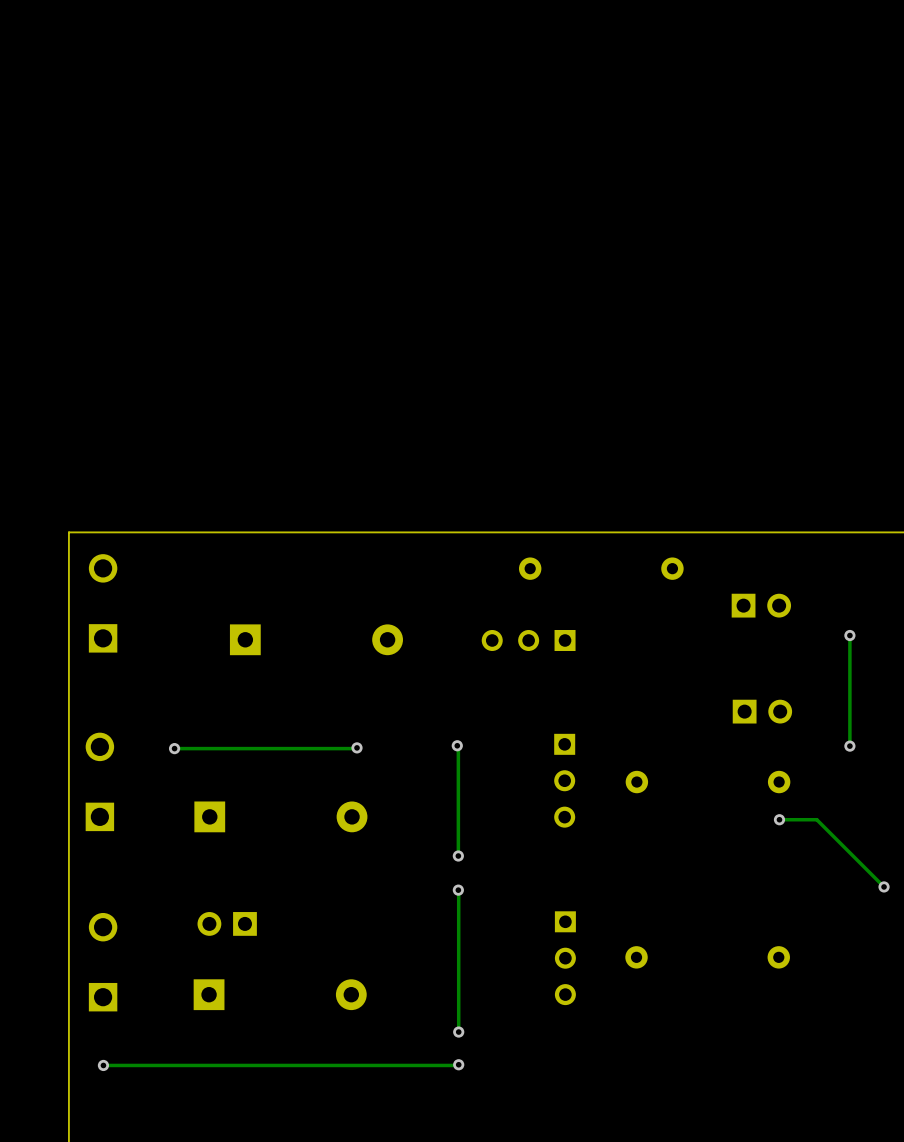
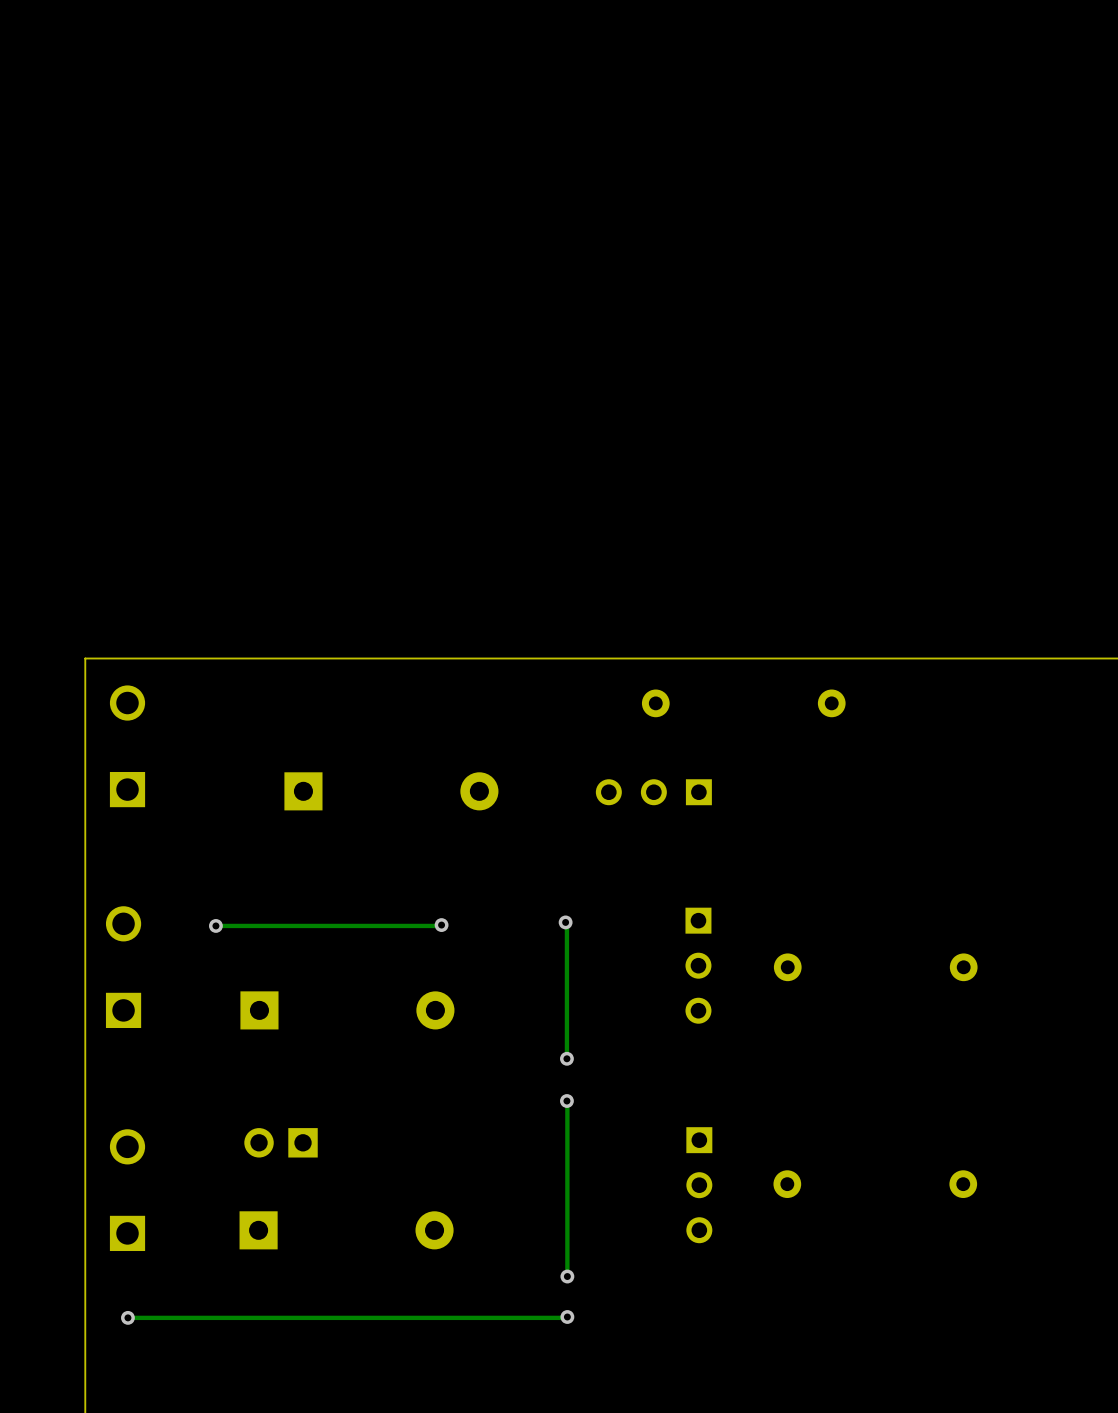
part: (761, 605) -> none
track: (849, 635) (849, 746) -> none
via: (849, 635) -> none
part: (762, 711) -> none
via: (849, 746) -> none
track: (779, 819) (816, 819) (884, 886) -> none
via: (779, 819) -> none
via: (884, 886) -> none

